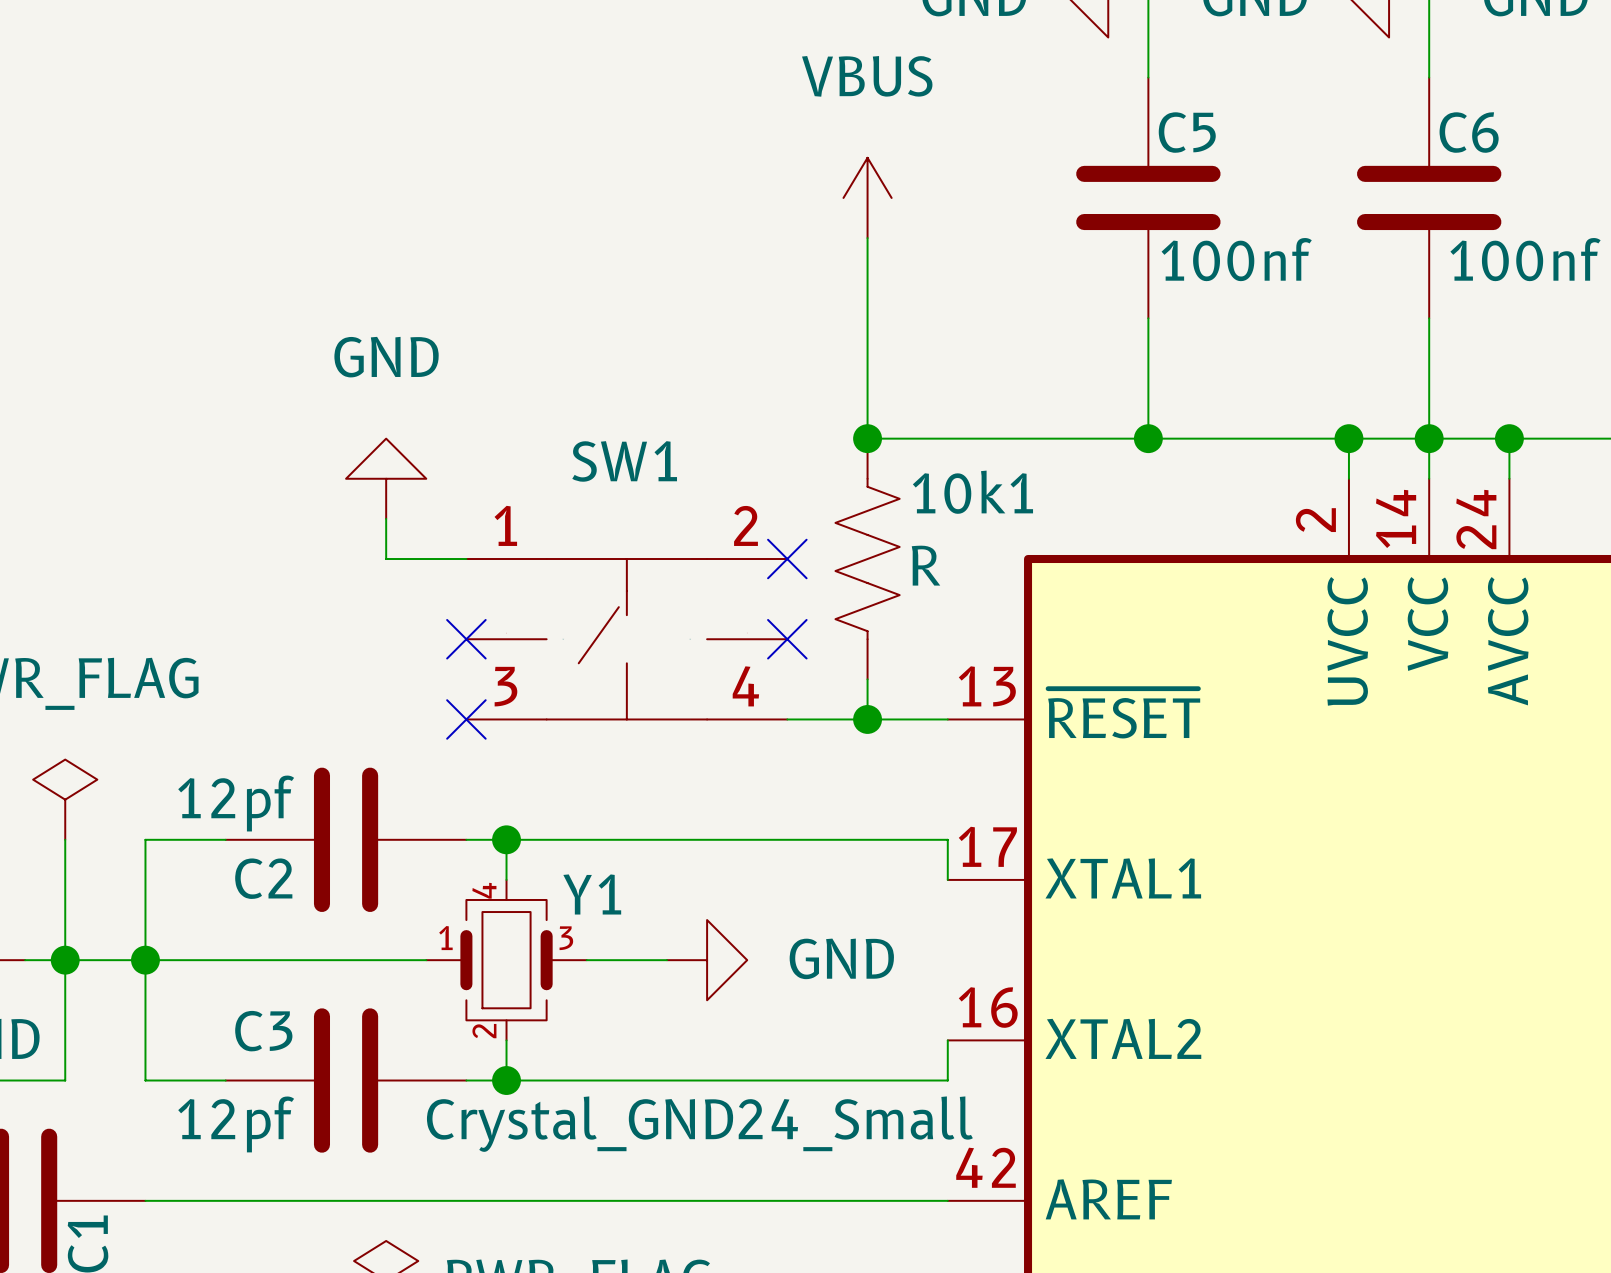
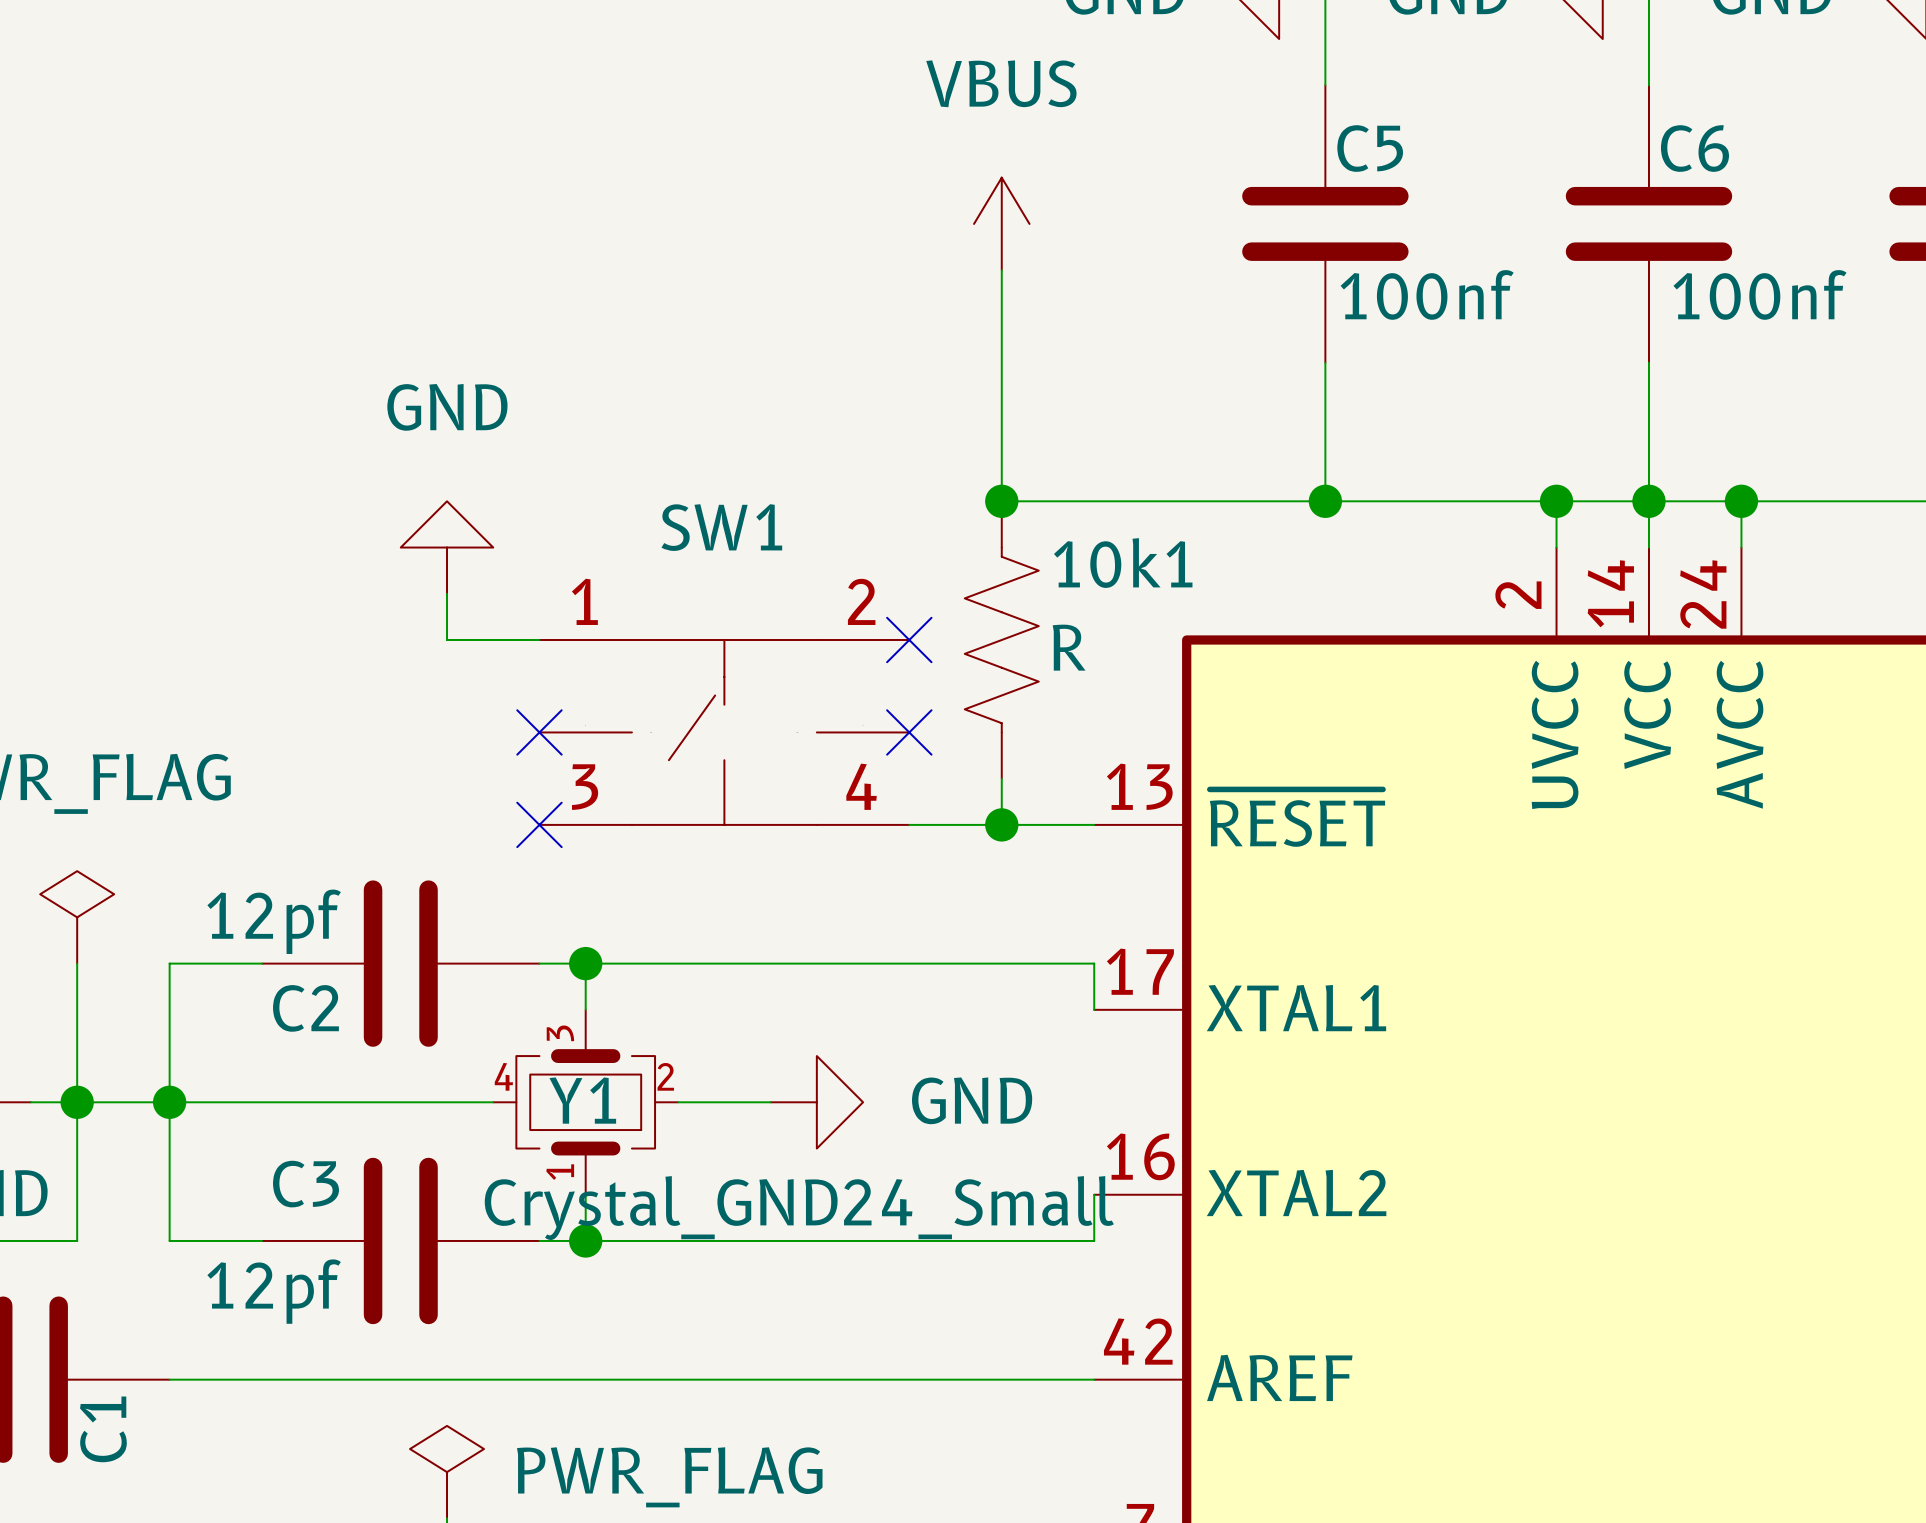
Y1 name position: Y1 (592, 894) -> Y1 (582, 1100)
Y1 rotation: 0° (506, 960) -> 90° counterclockwise (585, 1102)
Y1 value position: Crystal_GND24_Small (699, 1124) -> Crystal_GND24_Small (799, 1208)

